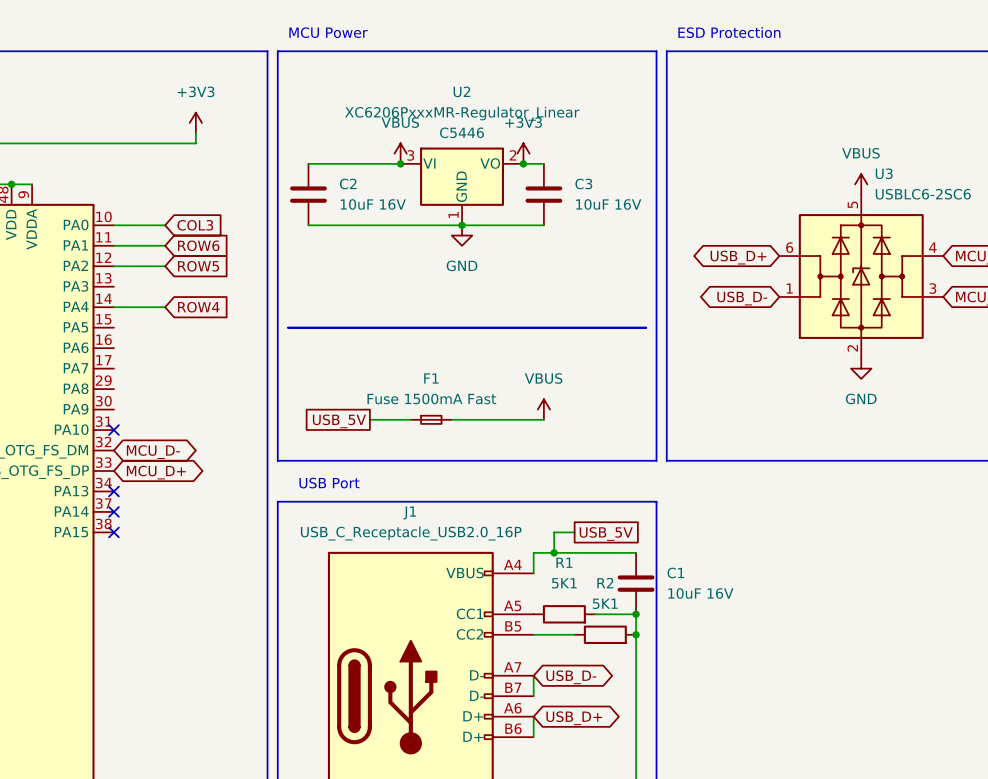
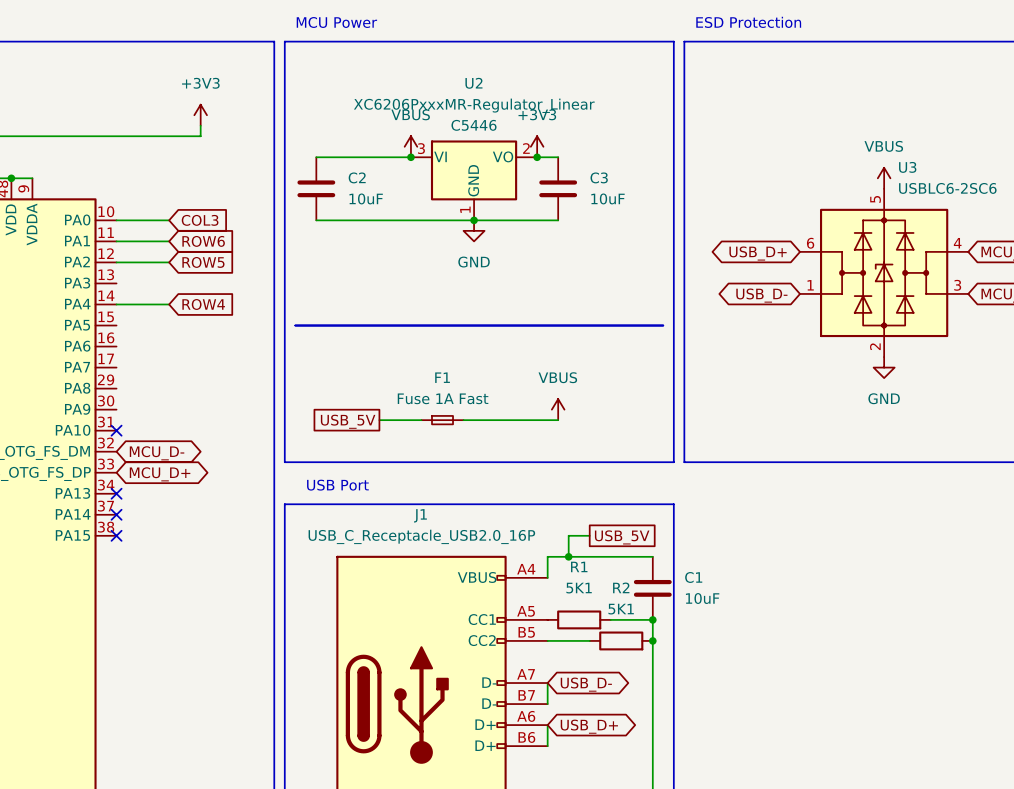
C2 value: 10uF 16V (373, 204) -> 10uF (366, 198)
C3 value: 10uF 16V (608, 204) -> 10uF (607, 198)
F1 value: Fuse 1500mA Fast (431, 398) -> Fuse 1A Fast (443, 398)
C1 value: 10uF 16V (700, 593) -> 10uF (702, 598)

